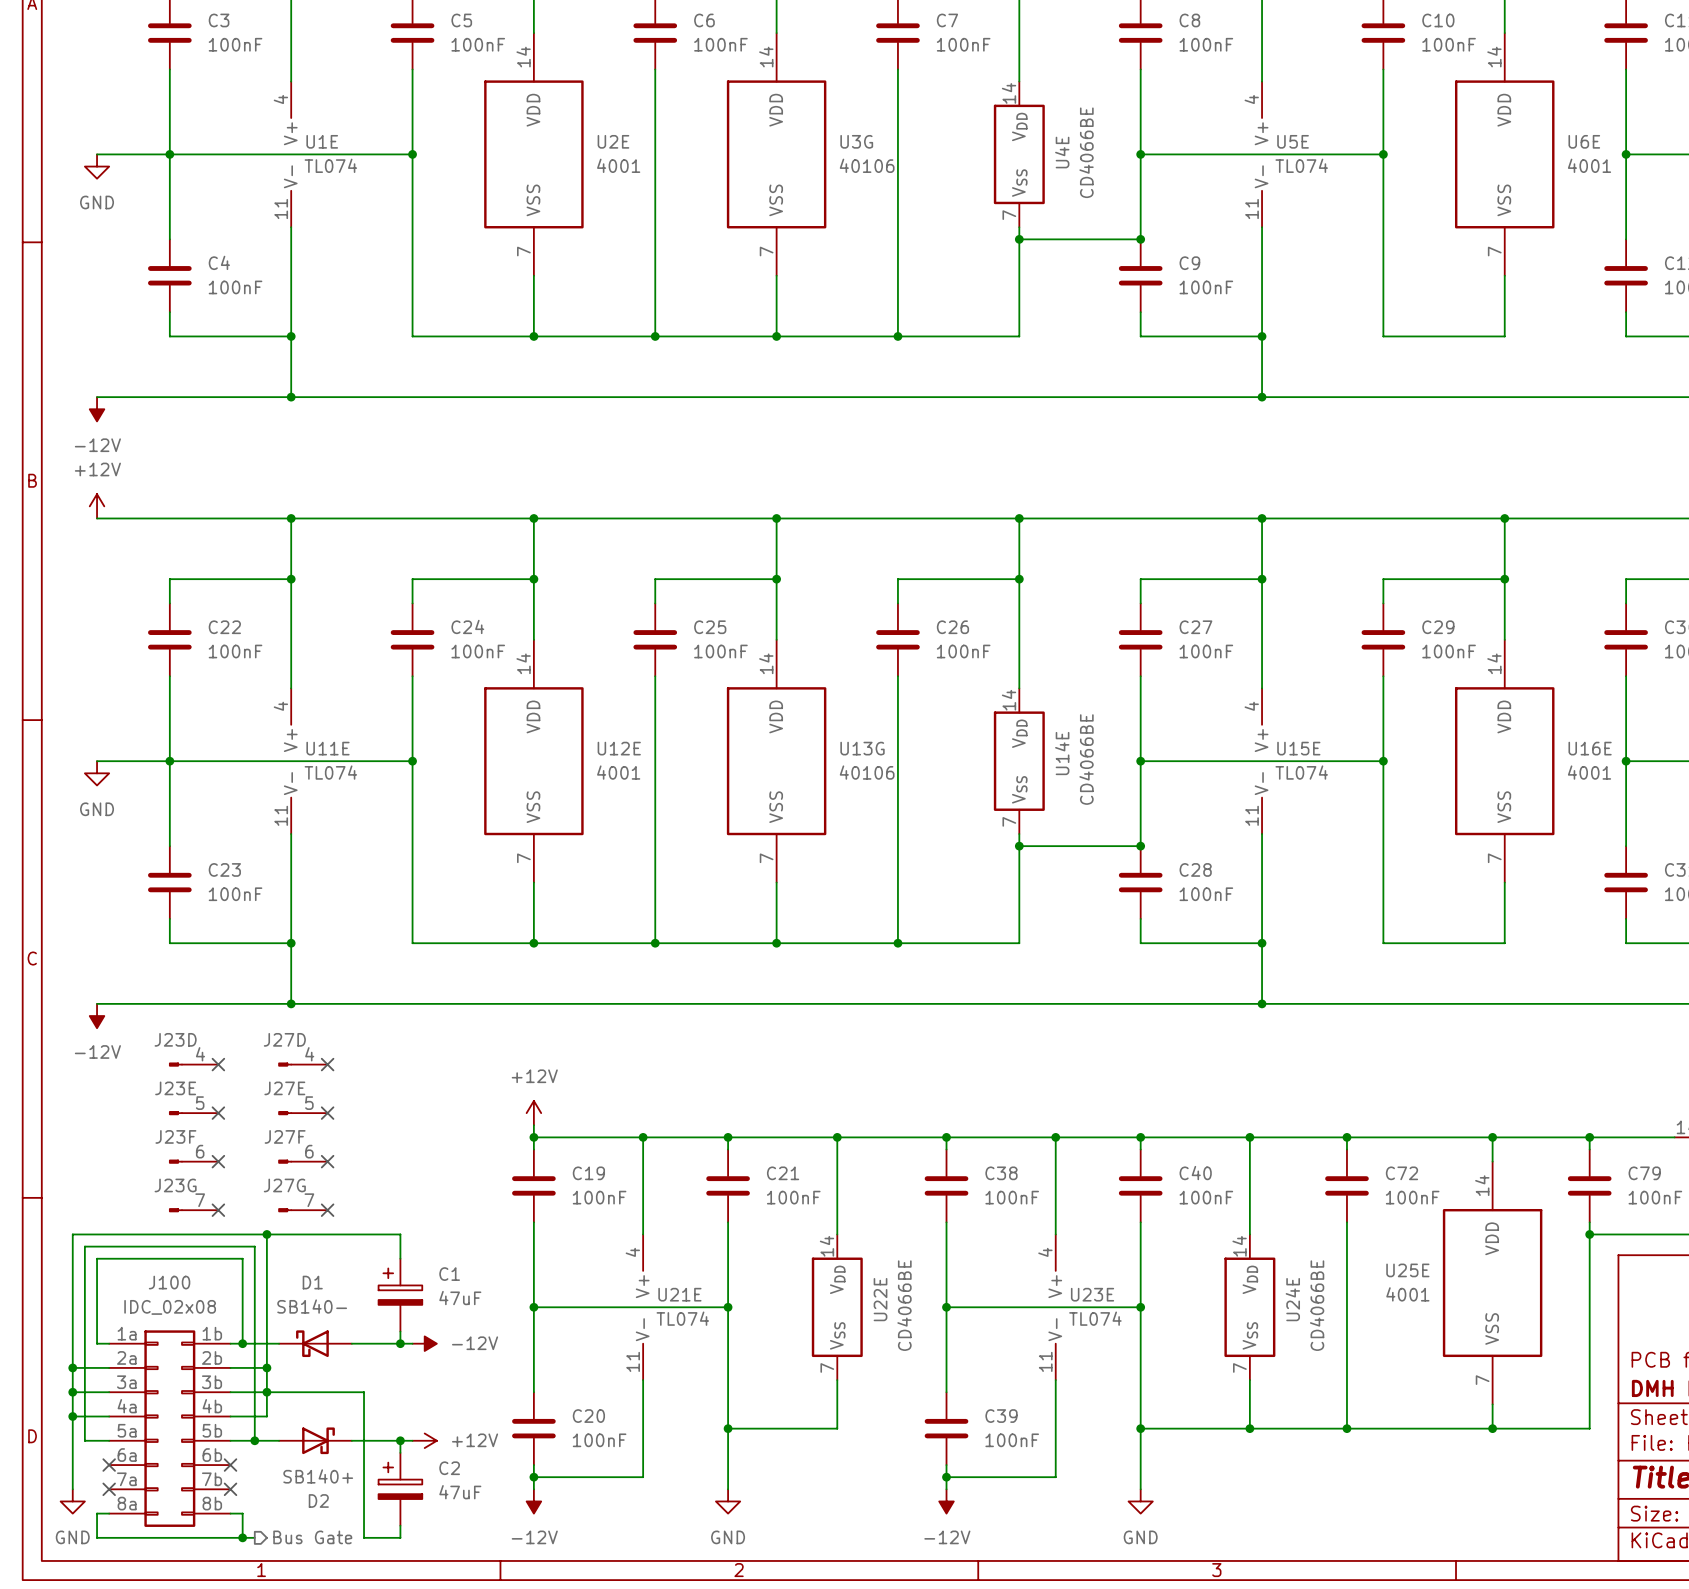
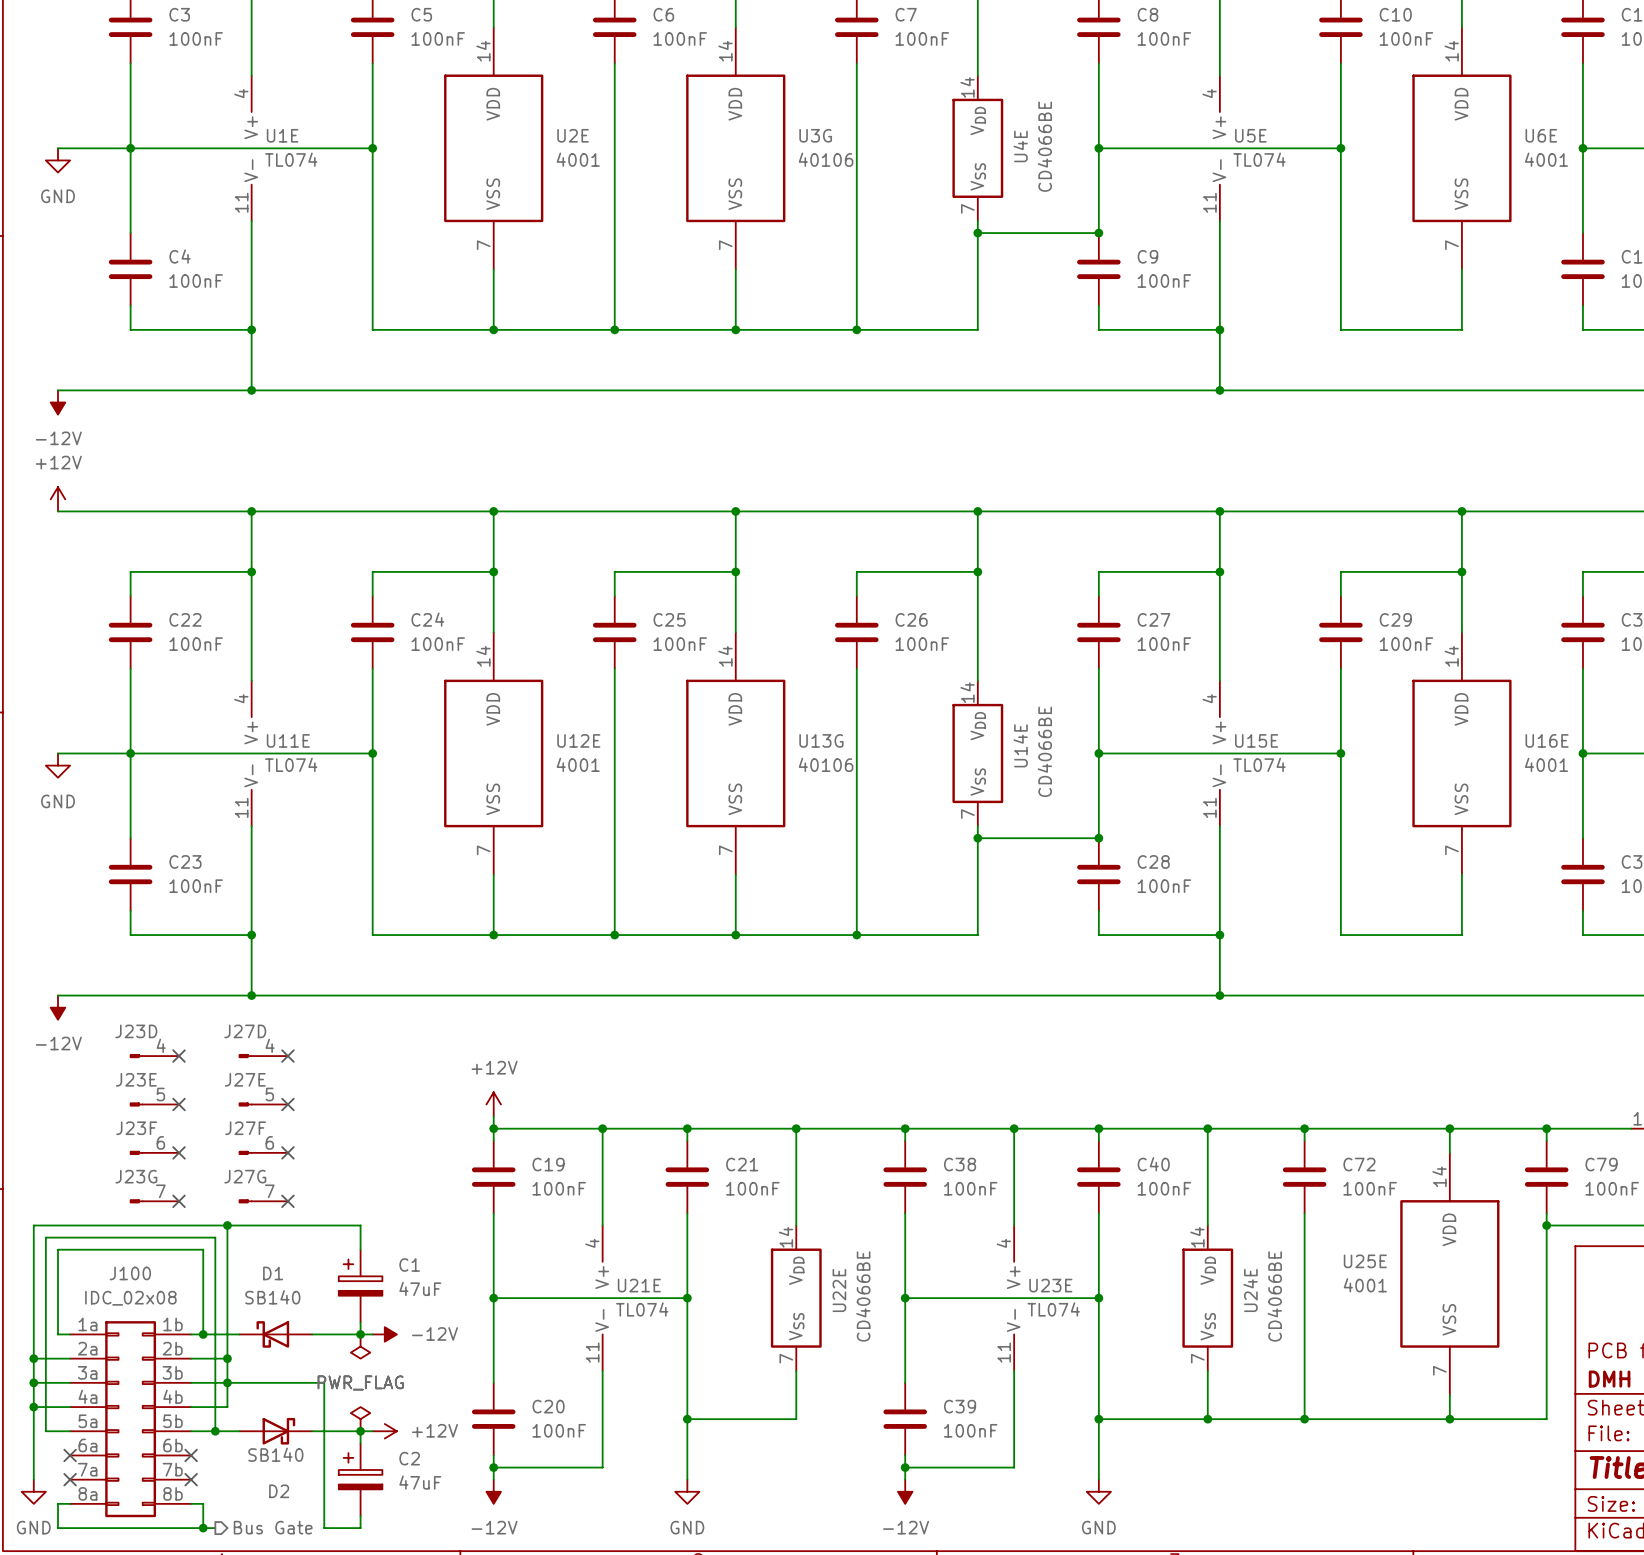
D1 value: SB140- (312, 1306) -> SB140 (272, 1297)
power symbol: none -> PWR_FLAG (360, 1346)
power symbol: none -> PWR_FLAG (360, 1419)
D2 value: SB140+ (318, 1476) -> SB140 (275, 1454)

